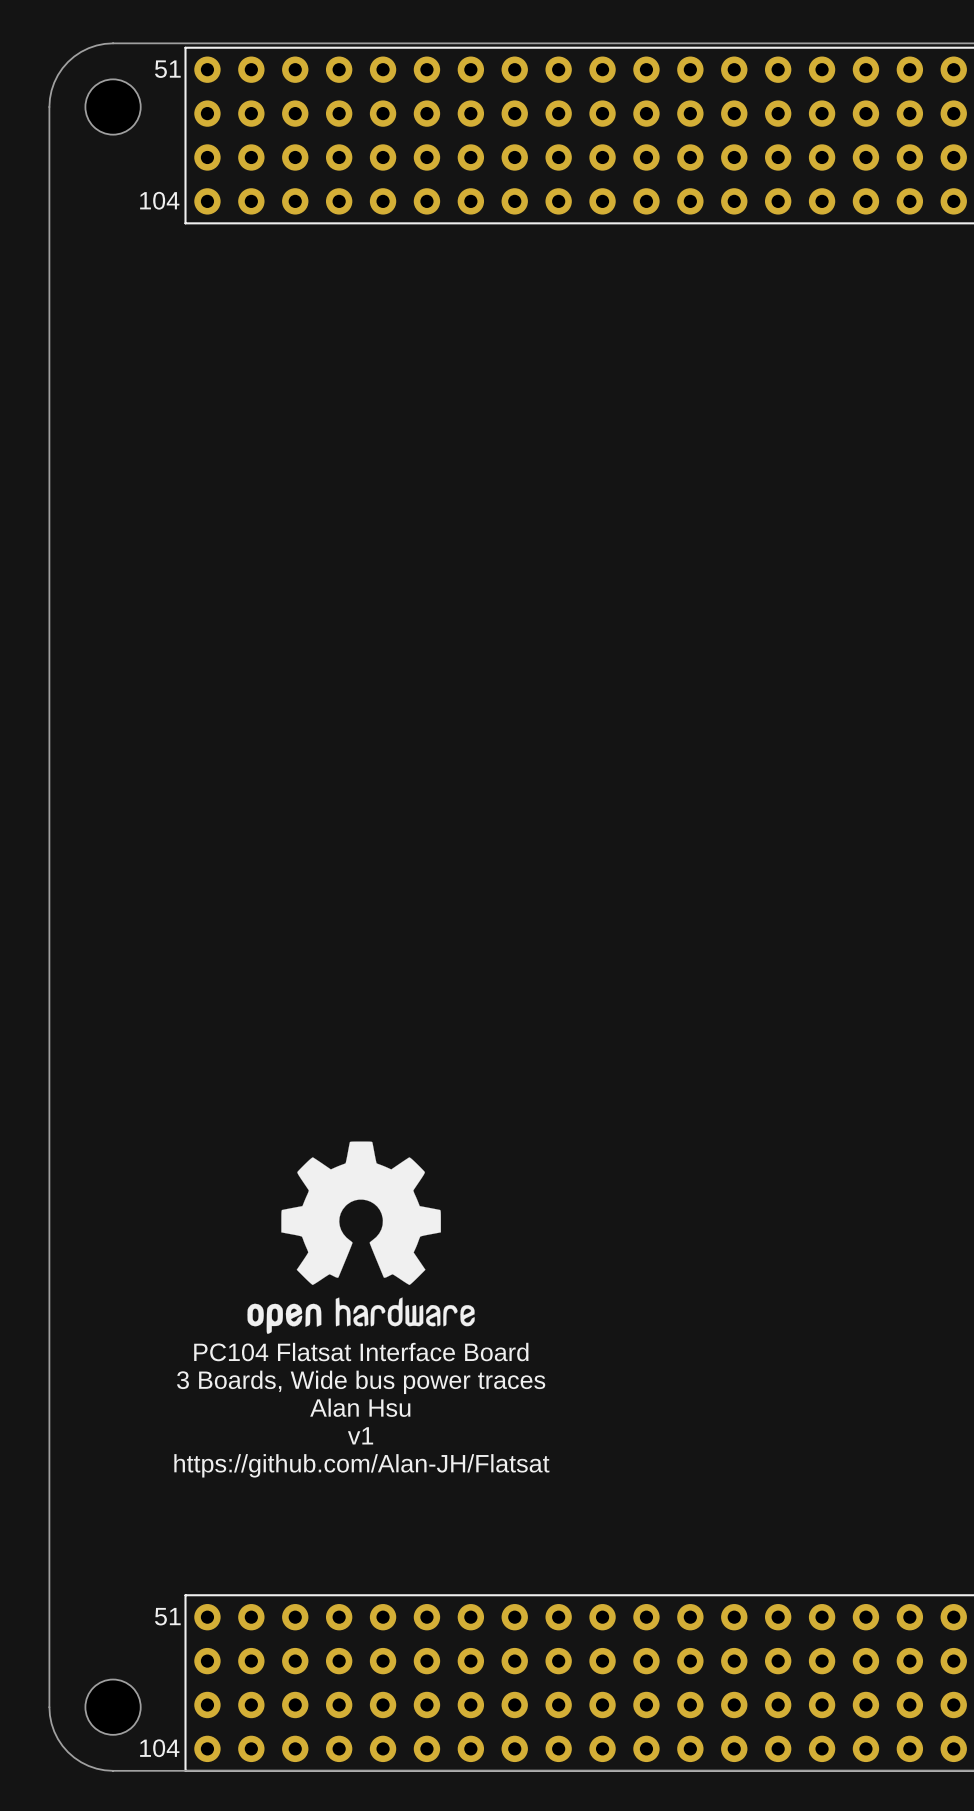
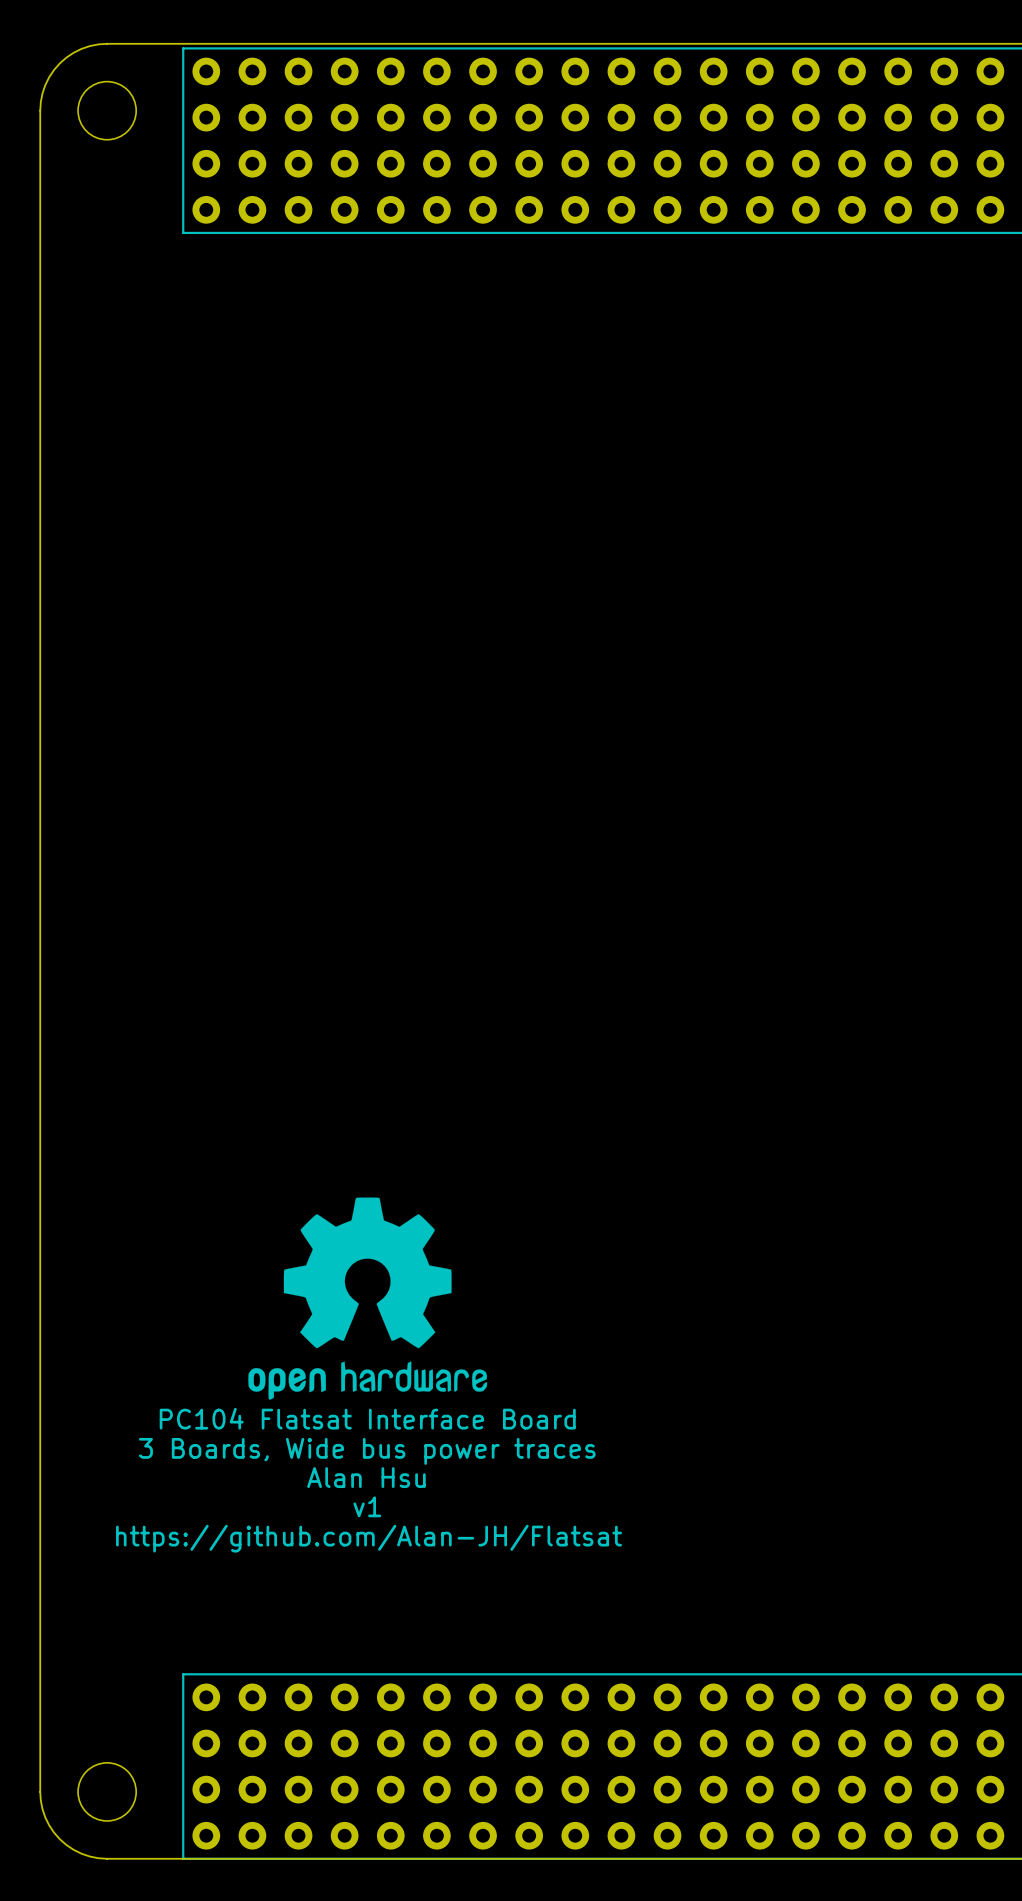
text: 51 (167, 69) -> none
text: 104 (159, 200) -> none
text: 51 (167, 1616) -> none
text: 104 (159, 1748) -> none

